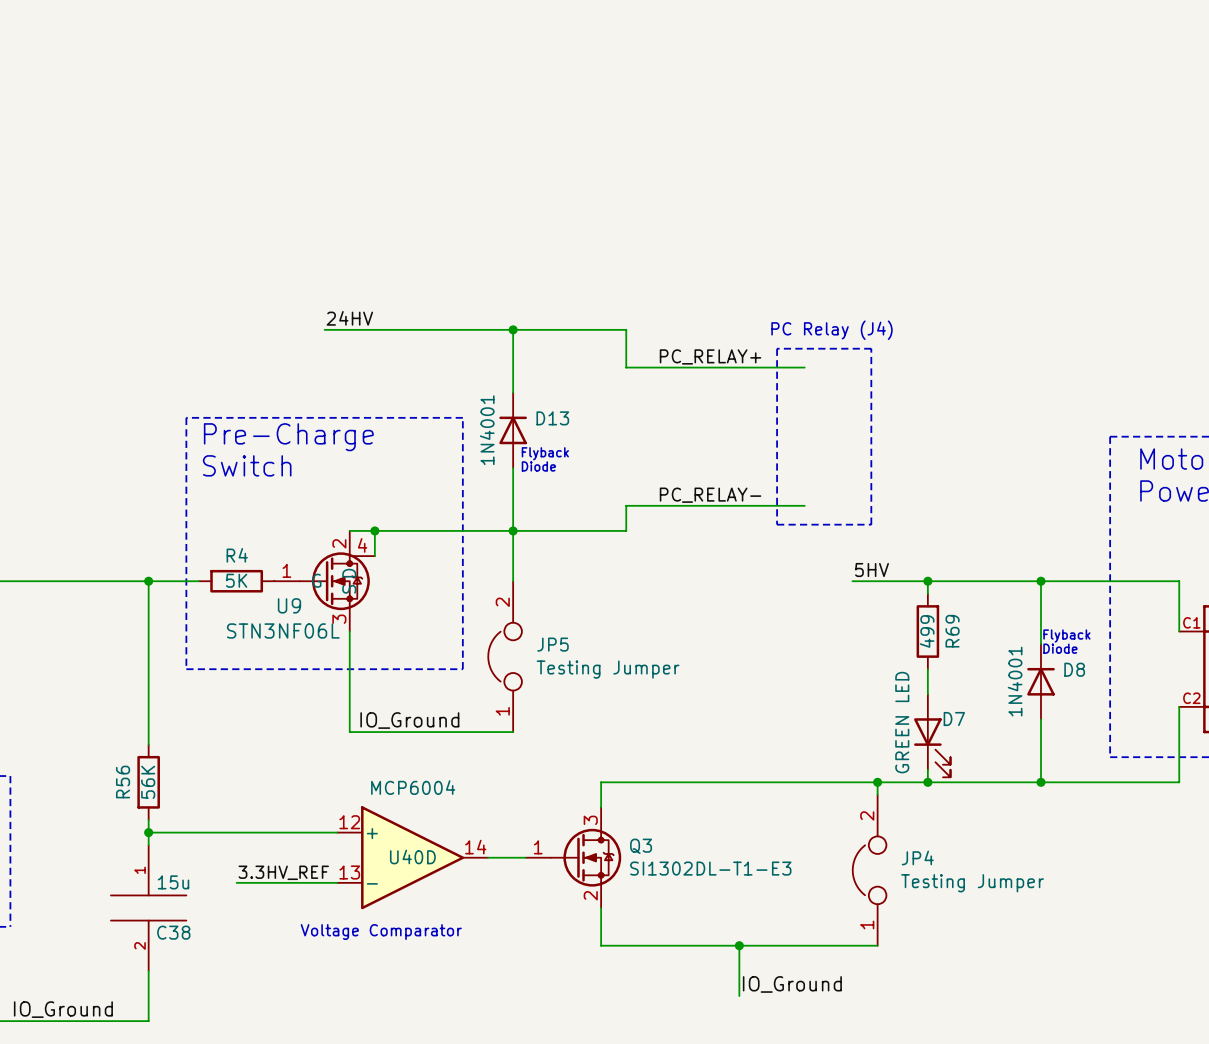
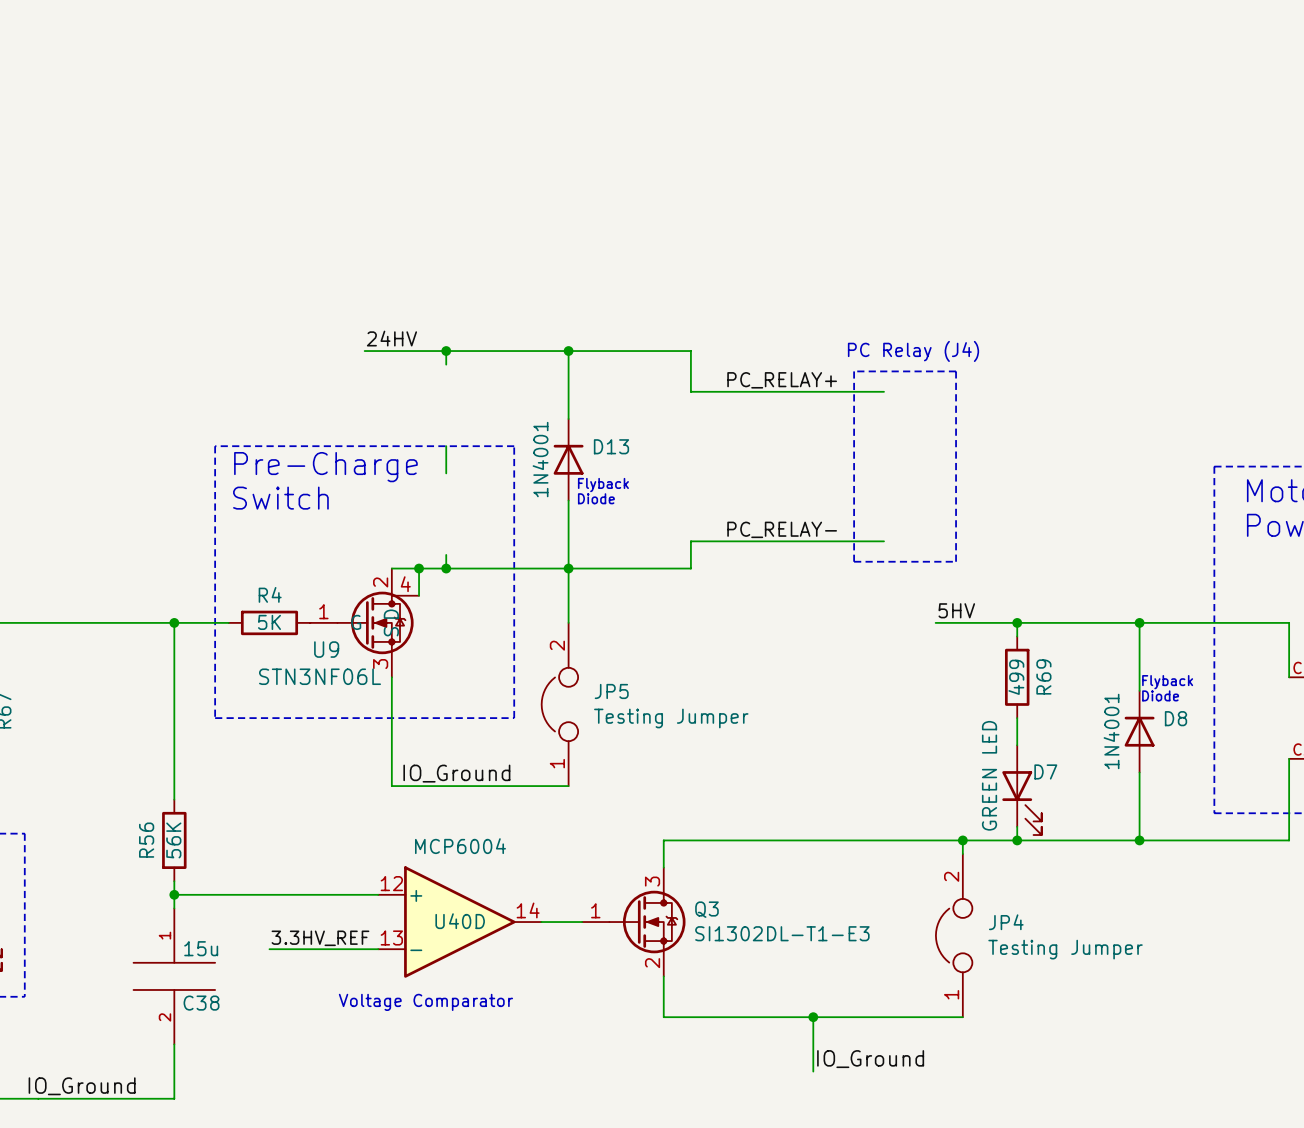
wire: none -> (446, 351) (446, 364)
junction: none -> (446, 351)
wire: none -> (446, 446) (446, 473)
wire: none -> (446, 554) (446, 568)
junction: none -> (446, 568)

